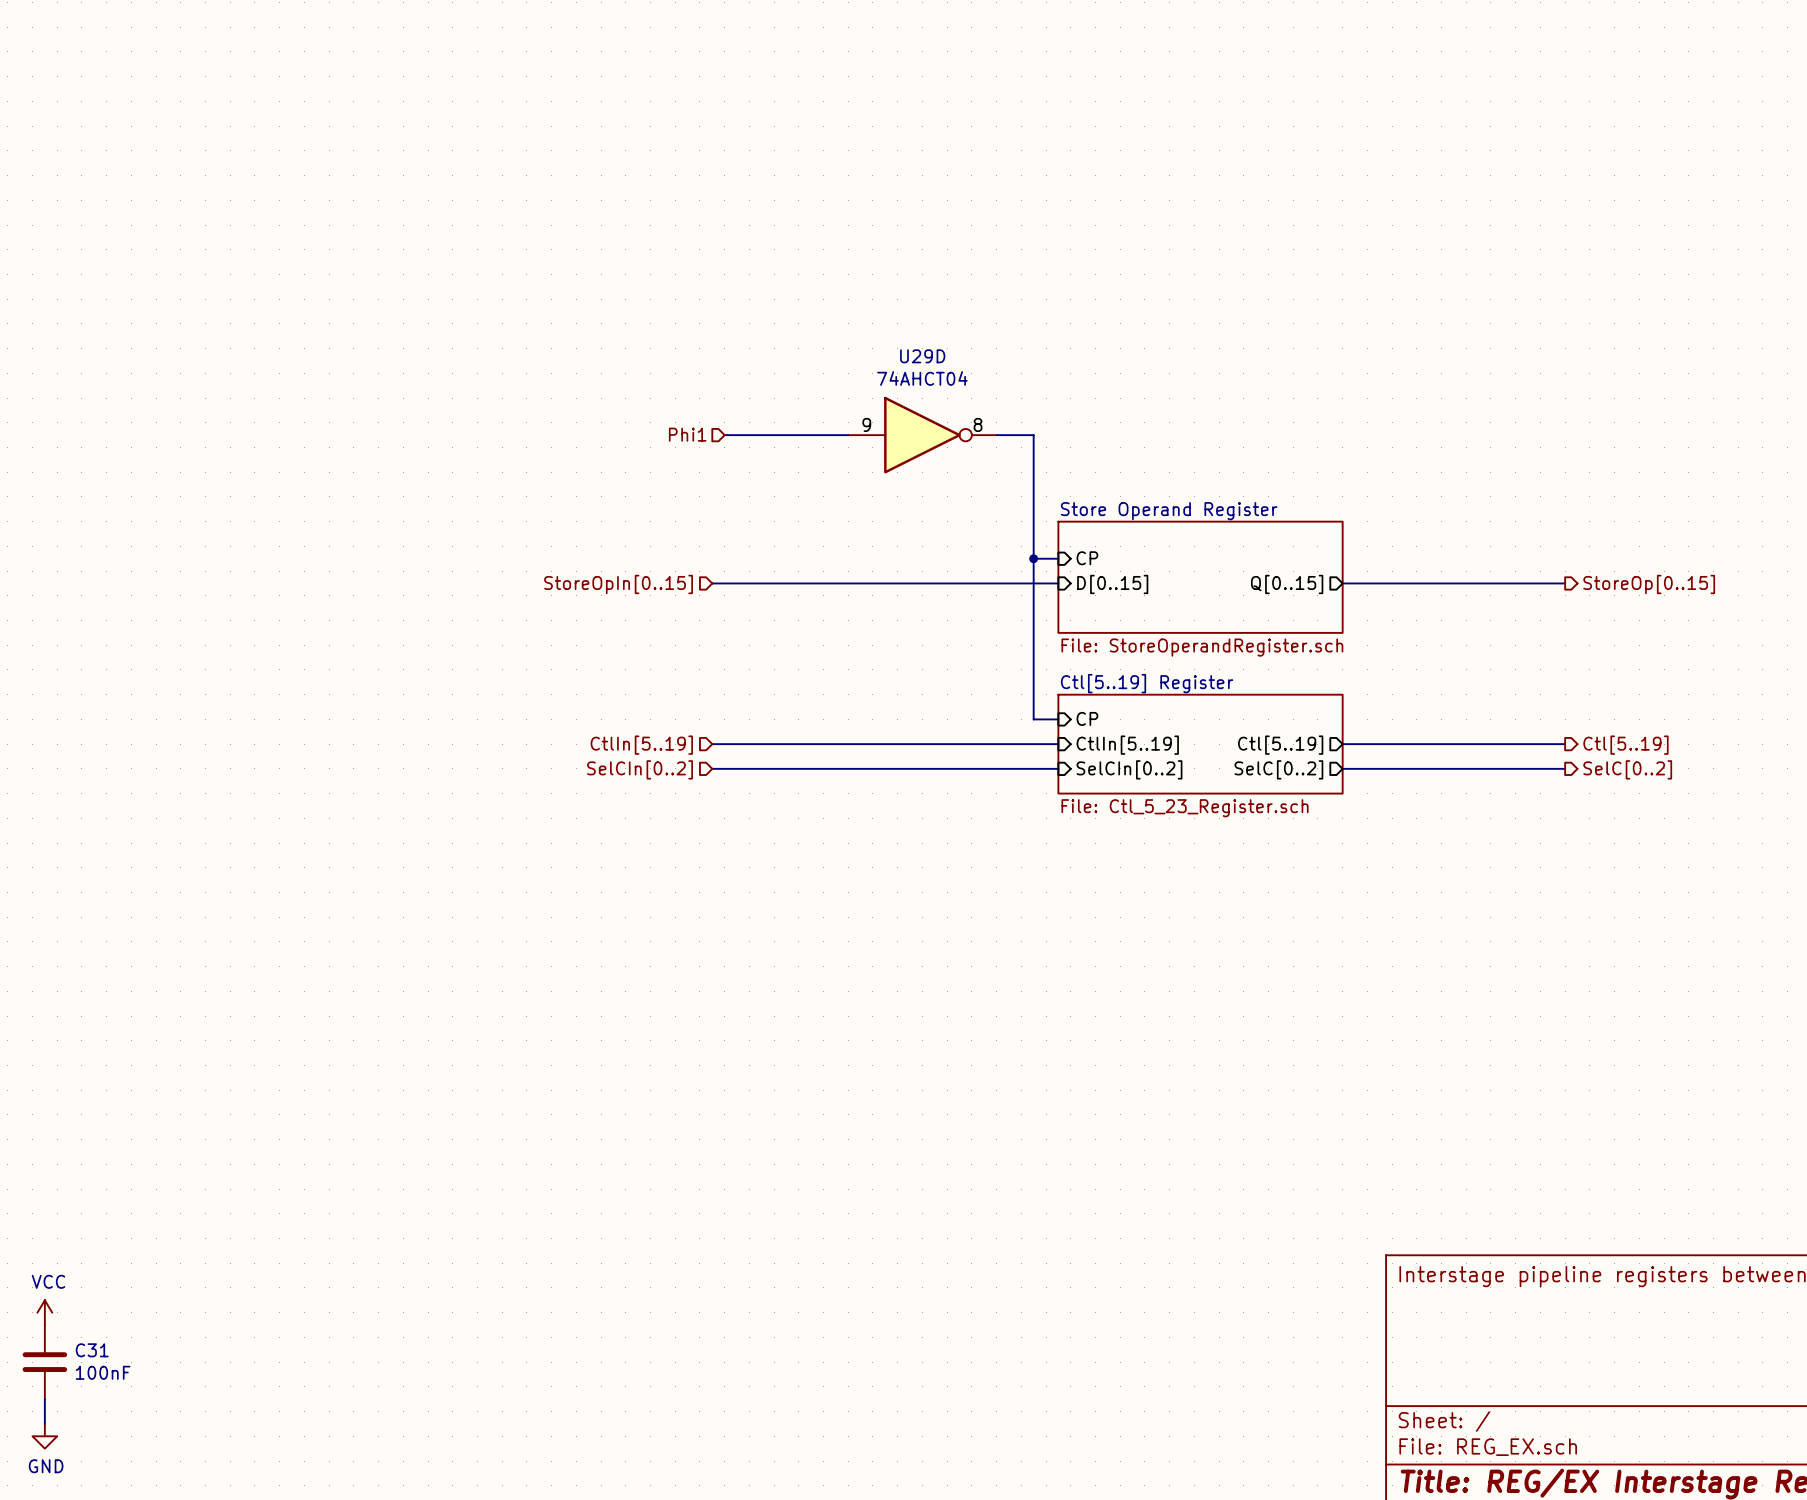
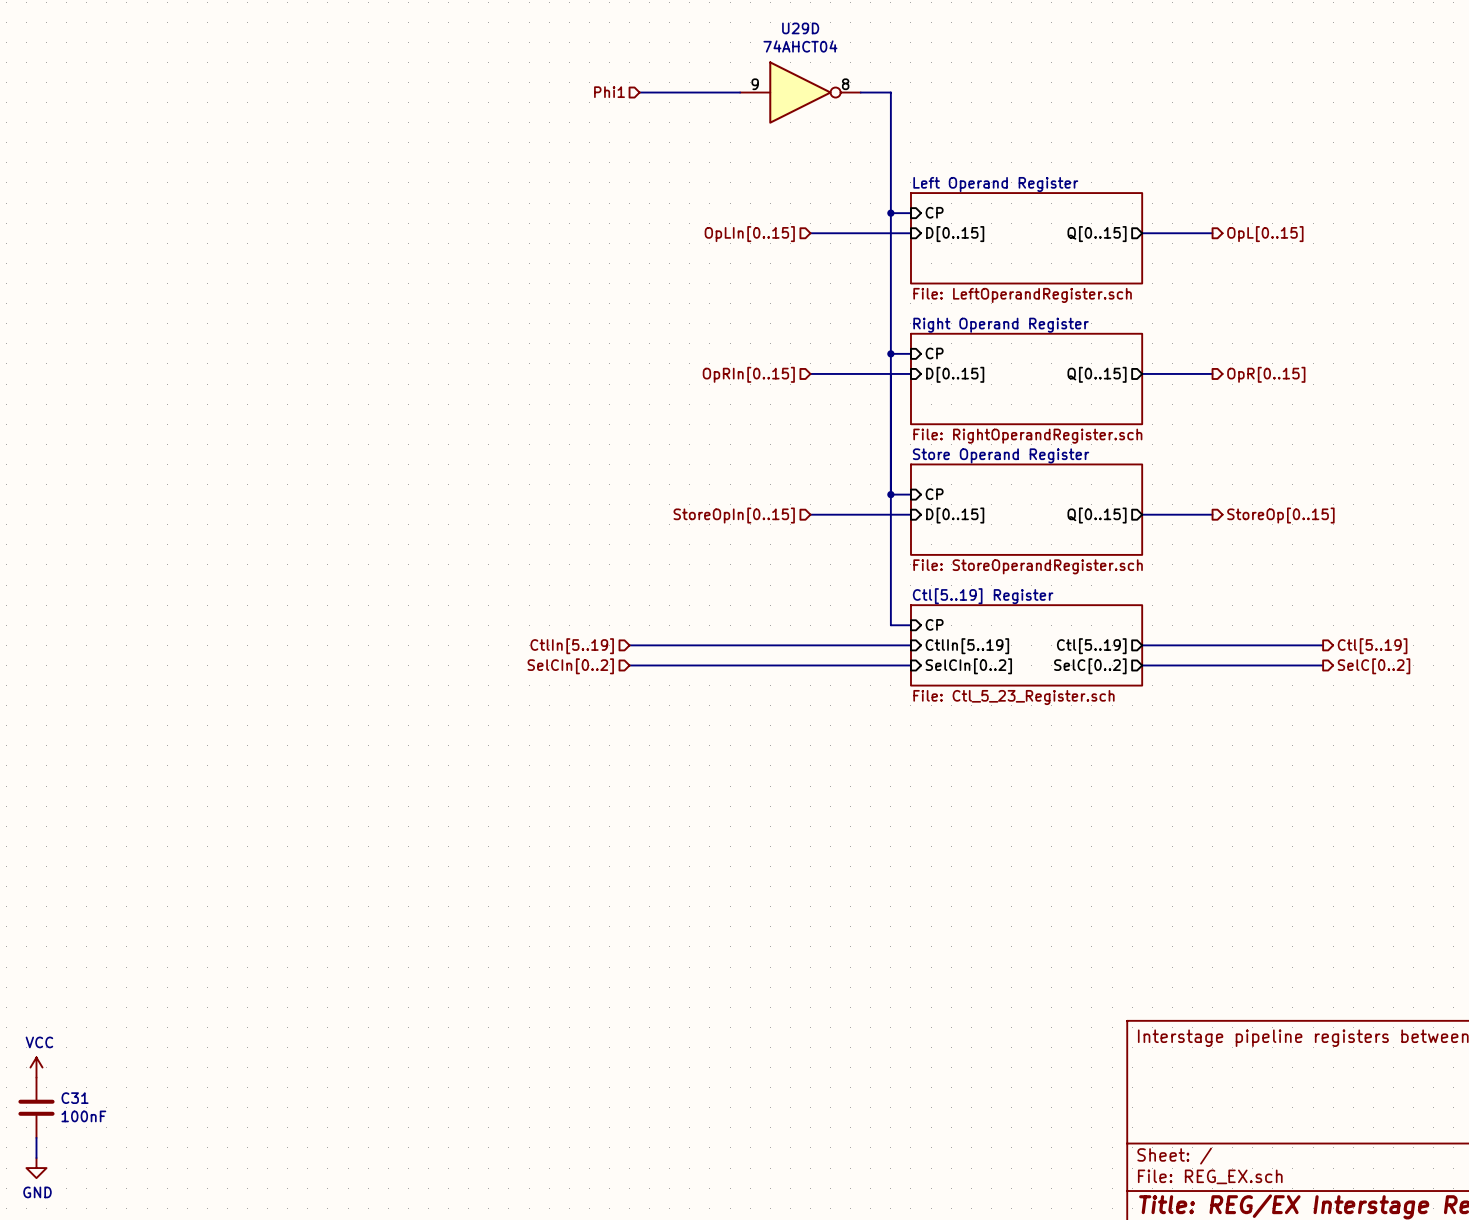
hierarchical label: none -> Phi1 (609, 92)
wire: none -> (639, 92) (740, 92)
wire: none -> (860, 92) (890, 92) (890, 625) (910, 625)
sheet pin: none -> CP (934, 212)
wire: none -> (890, 213) (910, 213)
junction: none -> (890, 213)
bus: none -> (810, 233) (910, 233)
bus: none -> (1142, 233) (1212, 233)
hierarchical label: none -> OpLIn[0..15] (749, 234)
sheet pin: none -> D[0..15] (955, 234)
sheet pin: none -> Q[0..15] (1097, 234)
hierarchical label: none -> OpL[0..15] (1265, 234)
sheet Left Operand Register: none -> File: LeftOperandRegister.sch (1026, 238)
hierarchical label: Phi1 (687, 434) -> none
sheet pin: none -> CP (934, 353)
wire: (724, 435) (848, 435) -> none
U29D position: (922, 435) -> (800, 92)
wire: (996, 435) (1033, 435) (1033, 719) (1058, 719) -> none
wire: none -> (890, 353) (910, 353)
junction: none -> (890, 353)
bus: none -> (810, 373) (910, 373)
bus: none -> (1142, 373) (1212, 373)
hierarchical label: none -> OpRIn[0..15] (748, 374)
sheet pin: none -> D[0..15] (955, 374)
sheet pin: none -> Q[0..15] (1097, 374)
hierarchical label: none -> OpR[0..15] (1266, 374)
sheet Right Operand Register: none -> File: RightOperandRegister.sch (1026, 379)
wire: (1033, 558) (1058, 558) -> (890, 494) (910, 494)
junction: (1033, 558) -> none
sheet pin: CP (1087, 558) -> none
sheet Store Operand Register position: (1200, 577) -> (1026, 509)
bus: (712, 583) (1058, 583) -> none
bus: (1342, 583) (1565, 583) -> none
hierarchical label: StoreOpIn[0..15] (618, 584) -> none
sheet pin: D[0..15] (1112, 584) -> none
sheet pin: Q[0..15] (1287, 584) -> none
hierarchical label position: StoreOp[0..15] (1649, 584) -> StoreOp[0..15] (1280, 515)
sheet pin: none -> CP (934, 494)
junction: none -> (890, 494)
bus: none -> (810, 514) (910, 514)
bus: none -> (1142, 514) (1212, 514)
hierarchical label: none -> StoreOpIn[0..15] (734, 515)
sheet pin: none -> D[0..15] (955, 515)
sheet pin: none -> Q[0..15] (1097, 515)
sheet pin: CP (1087, 718) -> none
bus: (712, 744) (1058, 744) -> (629, 645) (910, 645)
sheet Ctl[5..19] Register position: (1200, 744) -> (1026, 645)
bus: (1342, 744) (1565, 744) -> (1142, 645) (1323, 645)
hierarchical label position: CtlIn[5..19] (641, 745) -> CtlIn[5..19] (572, 646)
sheet pin position: CtlIn[5..19] (1127, 745) -> CtlIn[5..19] (967, 646)
sheet pin position: Ctl[5..19] (1280, 745) -> Ctl[5..19] (1091, 646)
hierarchical label position: Ctl[5..19] (1625, 745) -> Ctl[5..19] (1372, 646)
bus: (712, 768) (1058, 768) -> (629, 665) (910, 665)
sheet pin: none -> CP (934, 624)
bus: (1342, 768) (1565, 768) -> (1142, 665) (1323, 665)
hierarchical label position: SelCIn[0..2] (640, 769) -> SelCIn[0..2] (570, 666)
sheet pin position: SelCIn[0..2] (1129, 769) -> SelCIn[0..2] (968, 666)
sheet pin position: SelC[0..2] (1278, 769) -> SelC[0..2] (1090, 666)
hierarchical label position: SelC[0..2] (1627, 769) -> SelC[0..2] (1374, 666)

